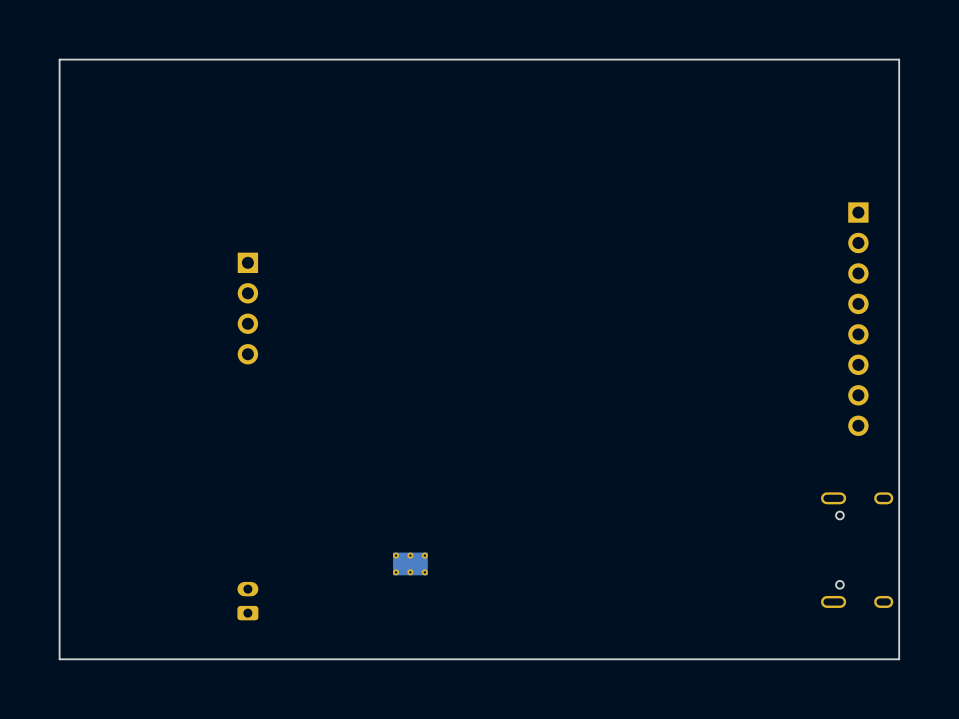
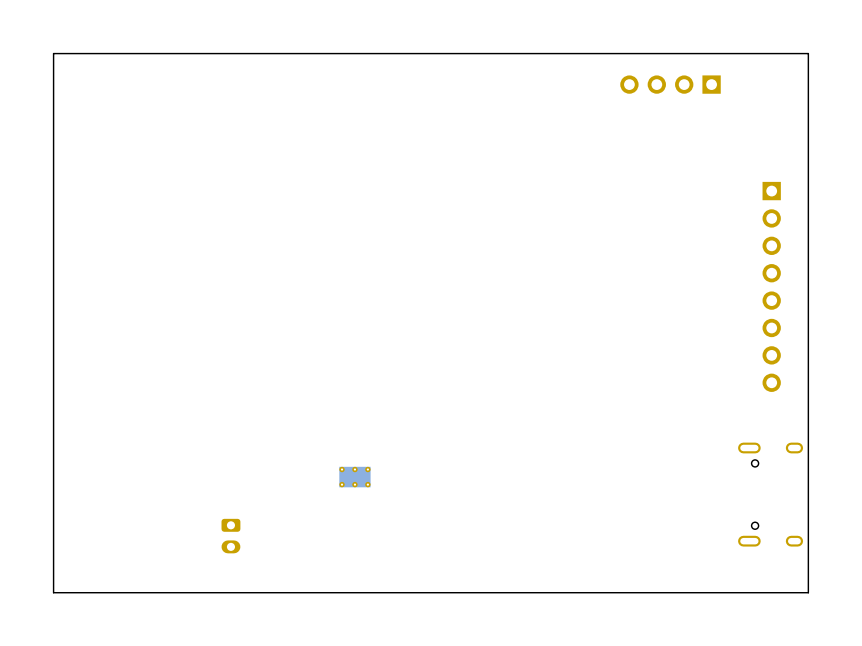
part: none -> (670, 84)
part: (247, 308) -> none
part position: (410, 563) -> (354, 477)
part rotation: 0° (247, 601) -> 180° (230, 536)

